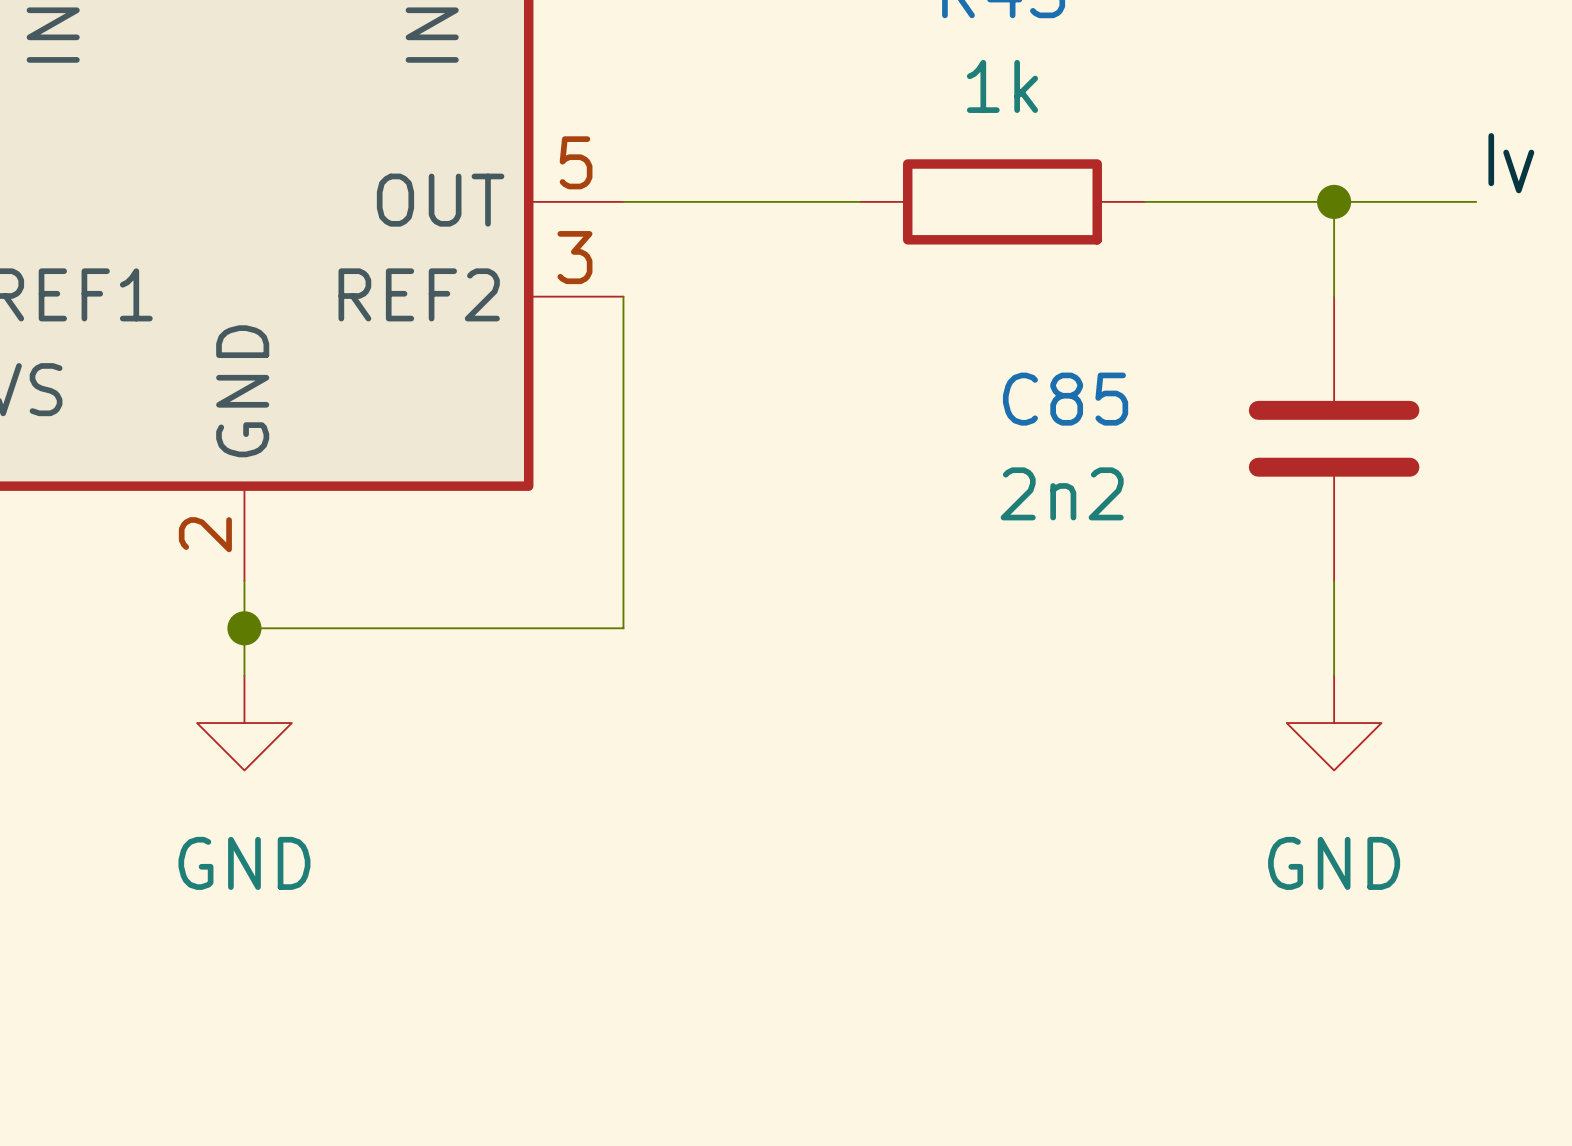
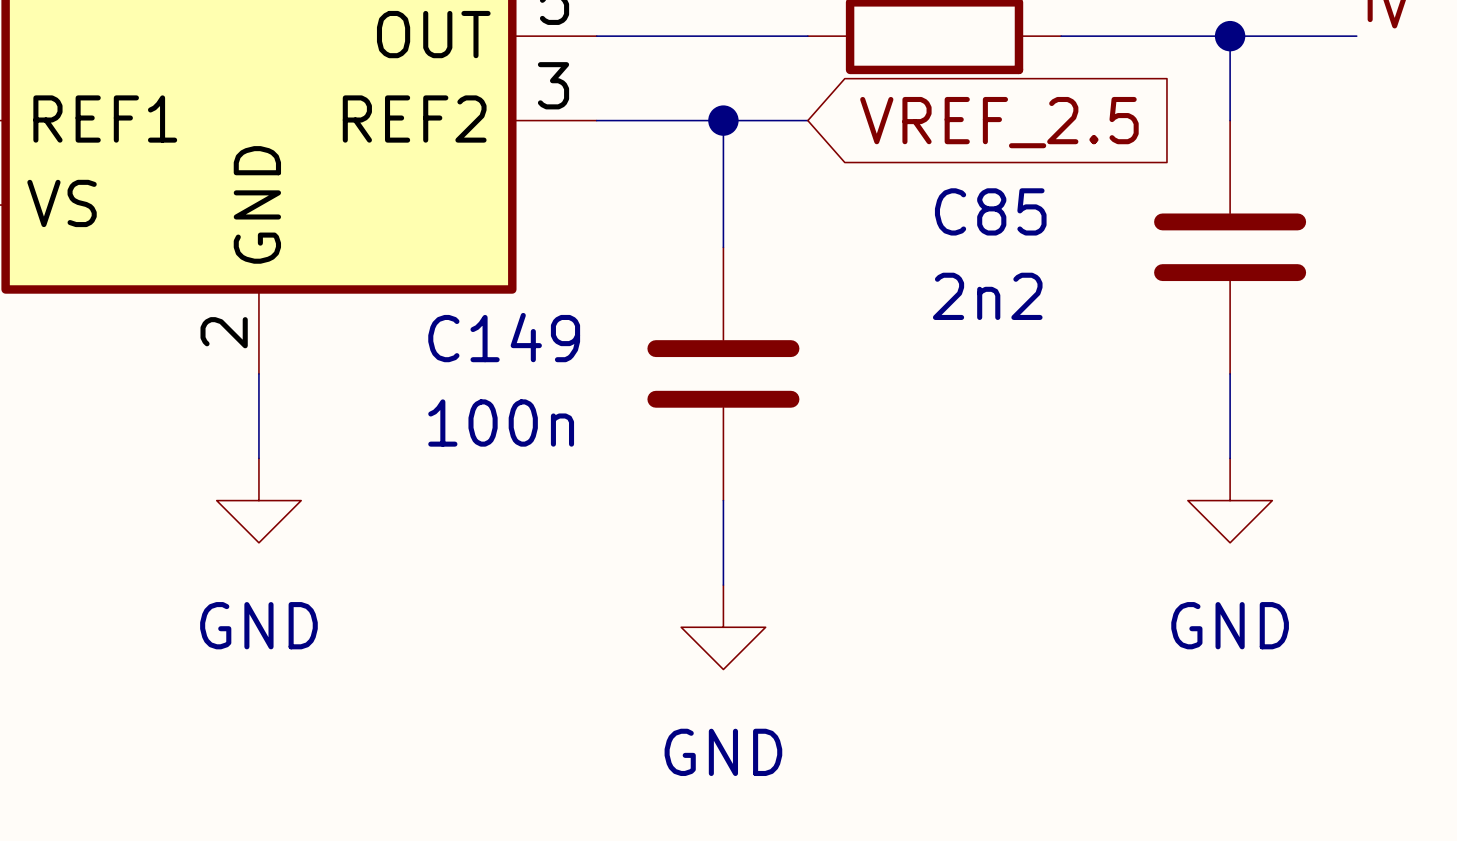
wire: (623, 296) (623, 628) (244, 628) -> (596, 120) (807, 120)
wire: none -> (723, 120) (723, 247)
junction: none -> (723, 120)
global label: none -> VREF_2.5 (999, 122)
C149: none -> 100n (723, 373)
junction: (244, 628) -> none
wire: none -> (723, 500) (723, 585)
power symbol: none -> GND (723, 627)

